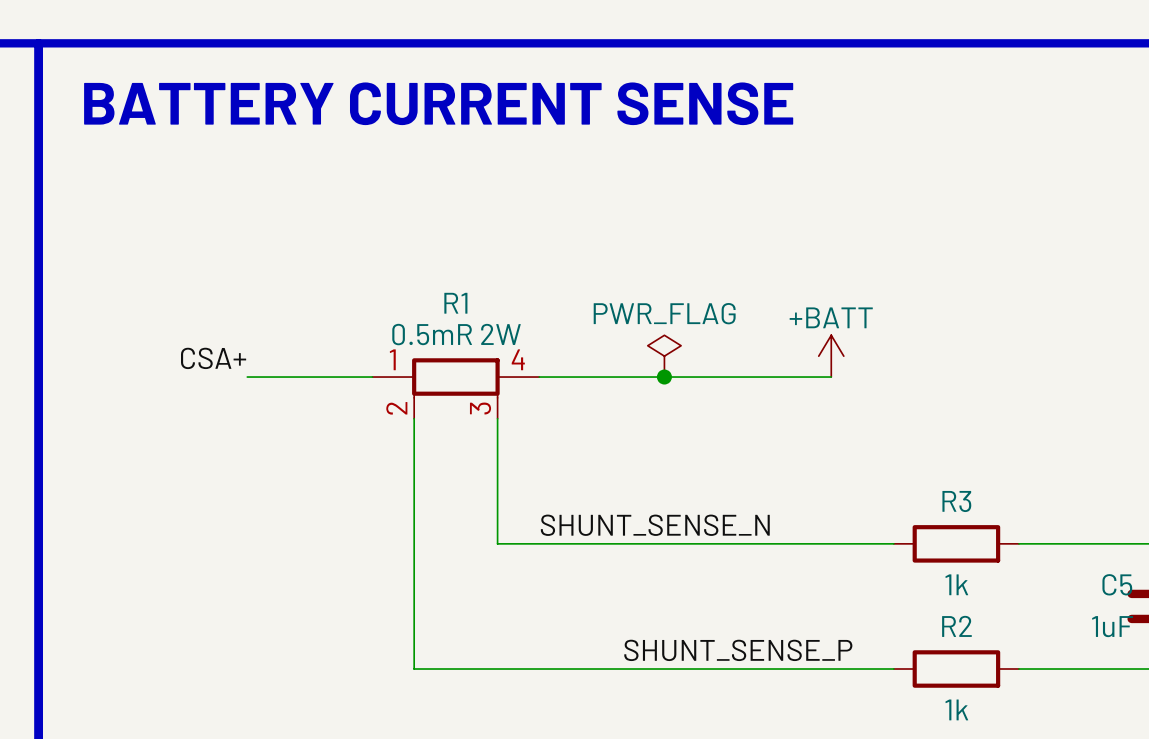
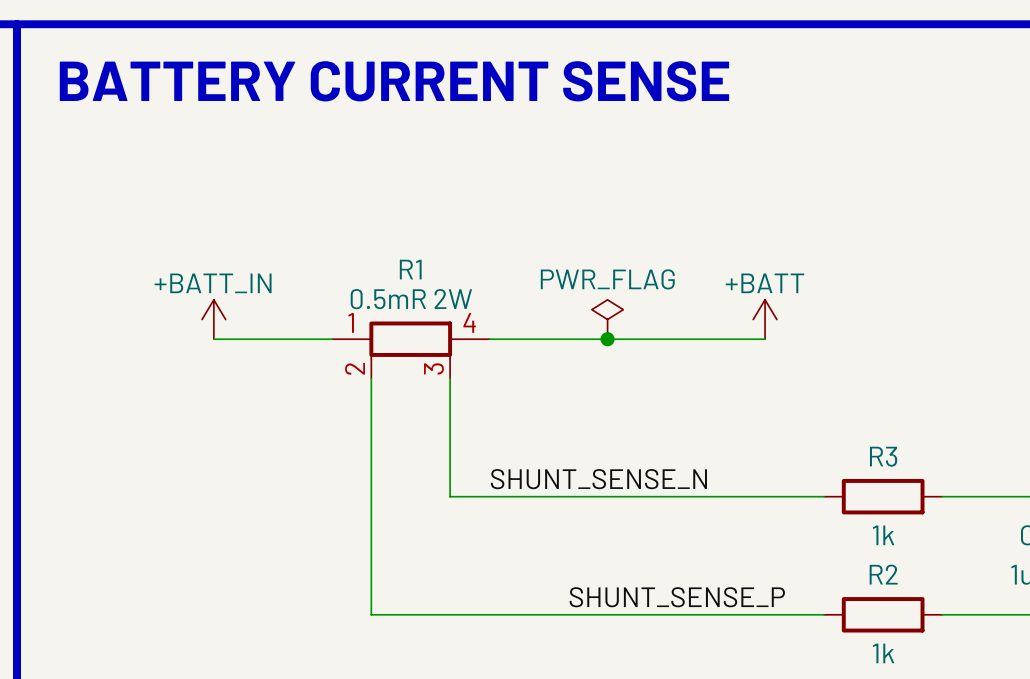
power symbol: none -> +BATT_IN (213, 319)
label: CSA+ (213, 358) -> none

